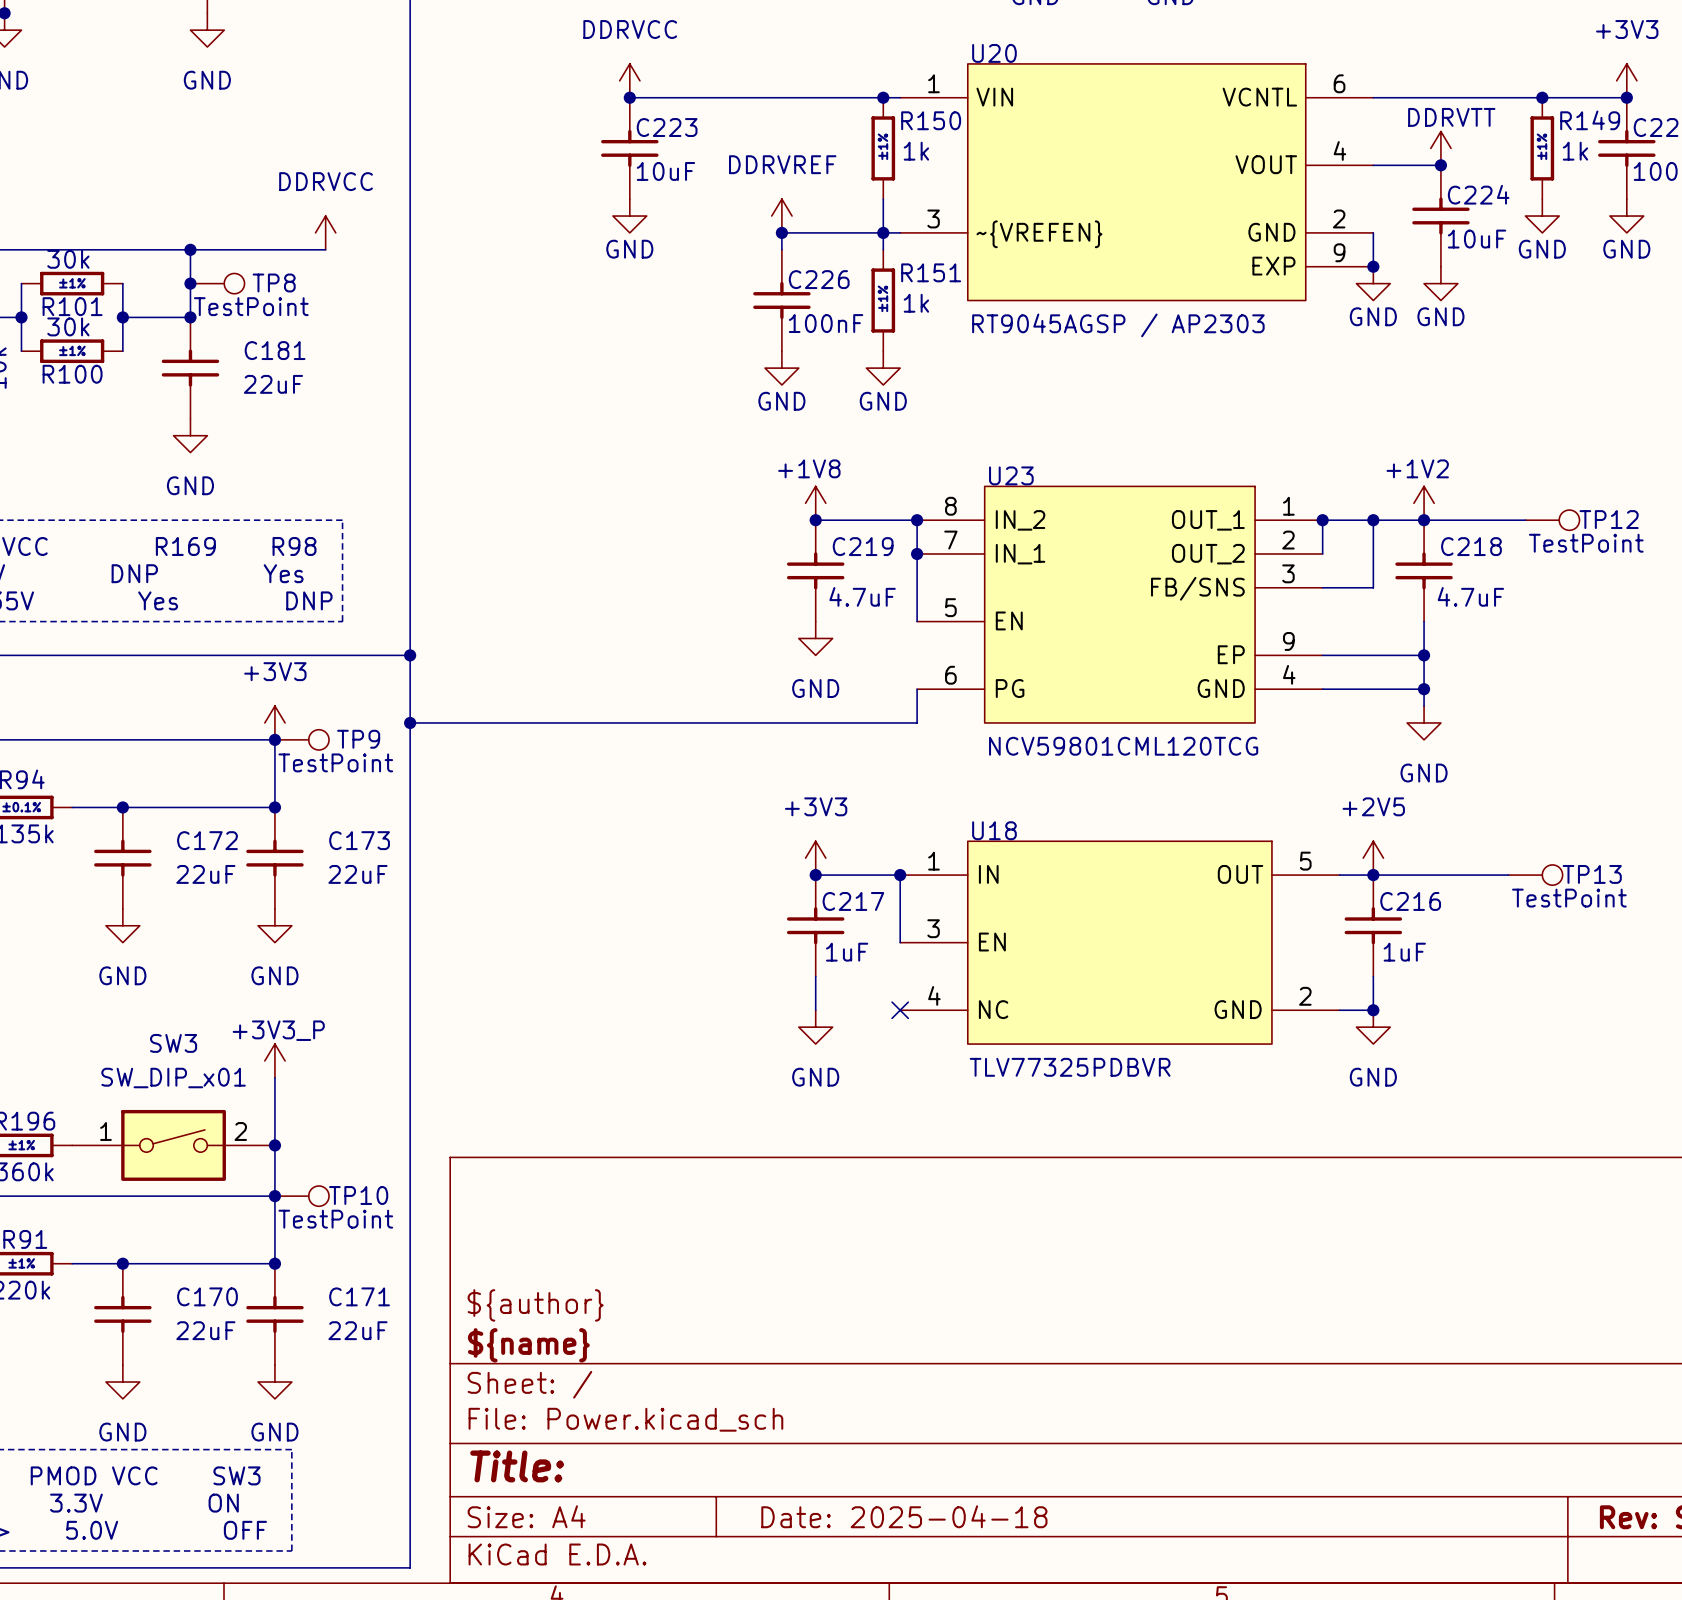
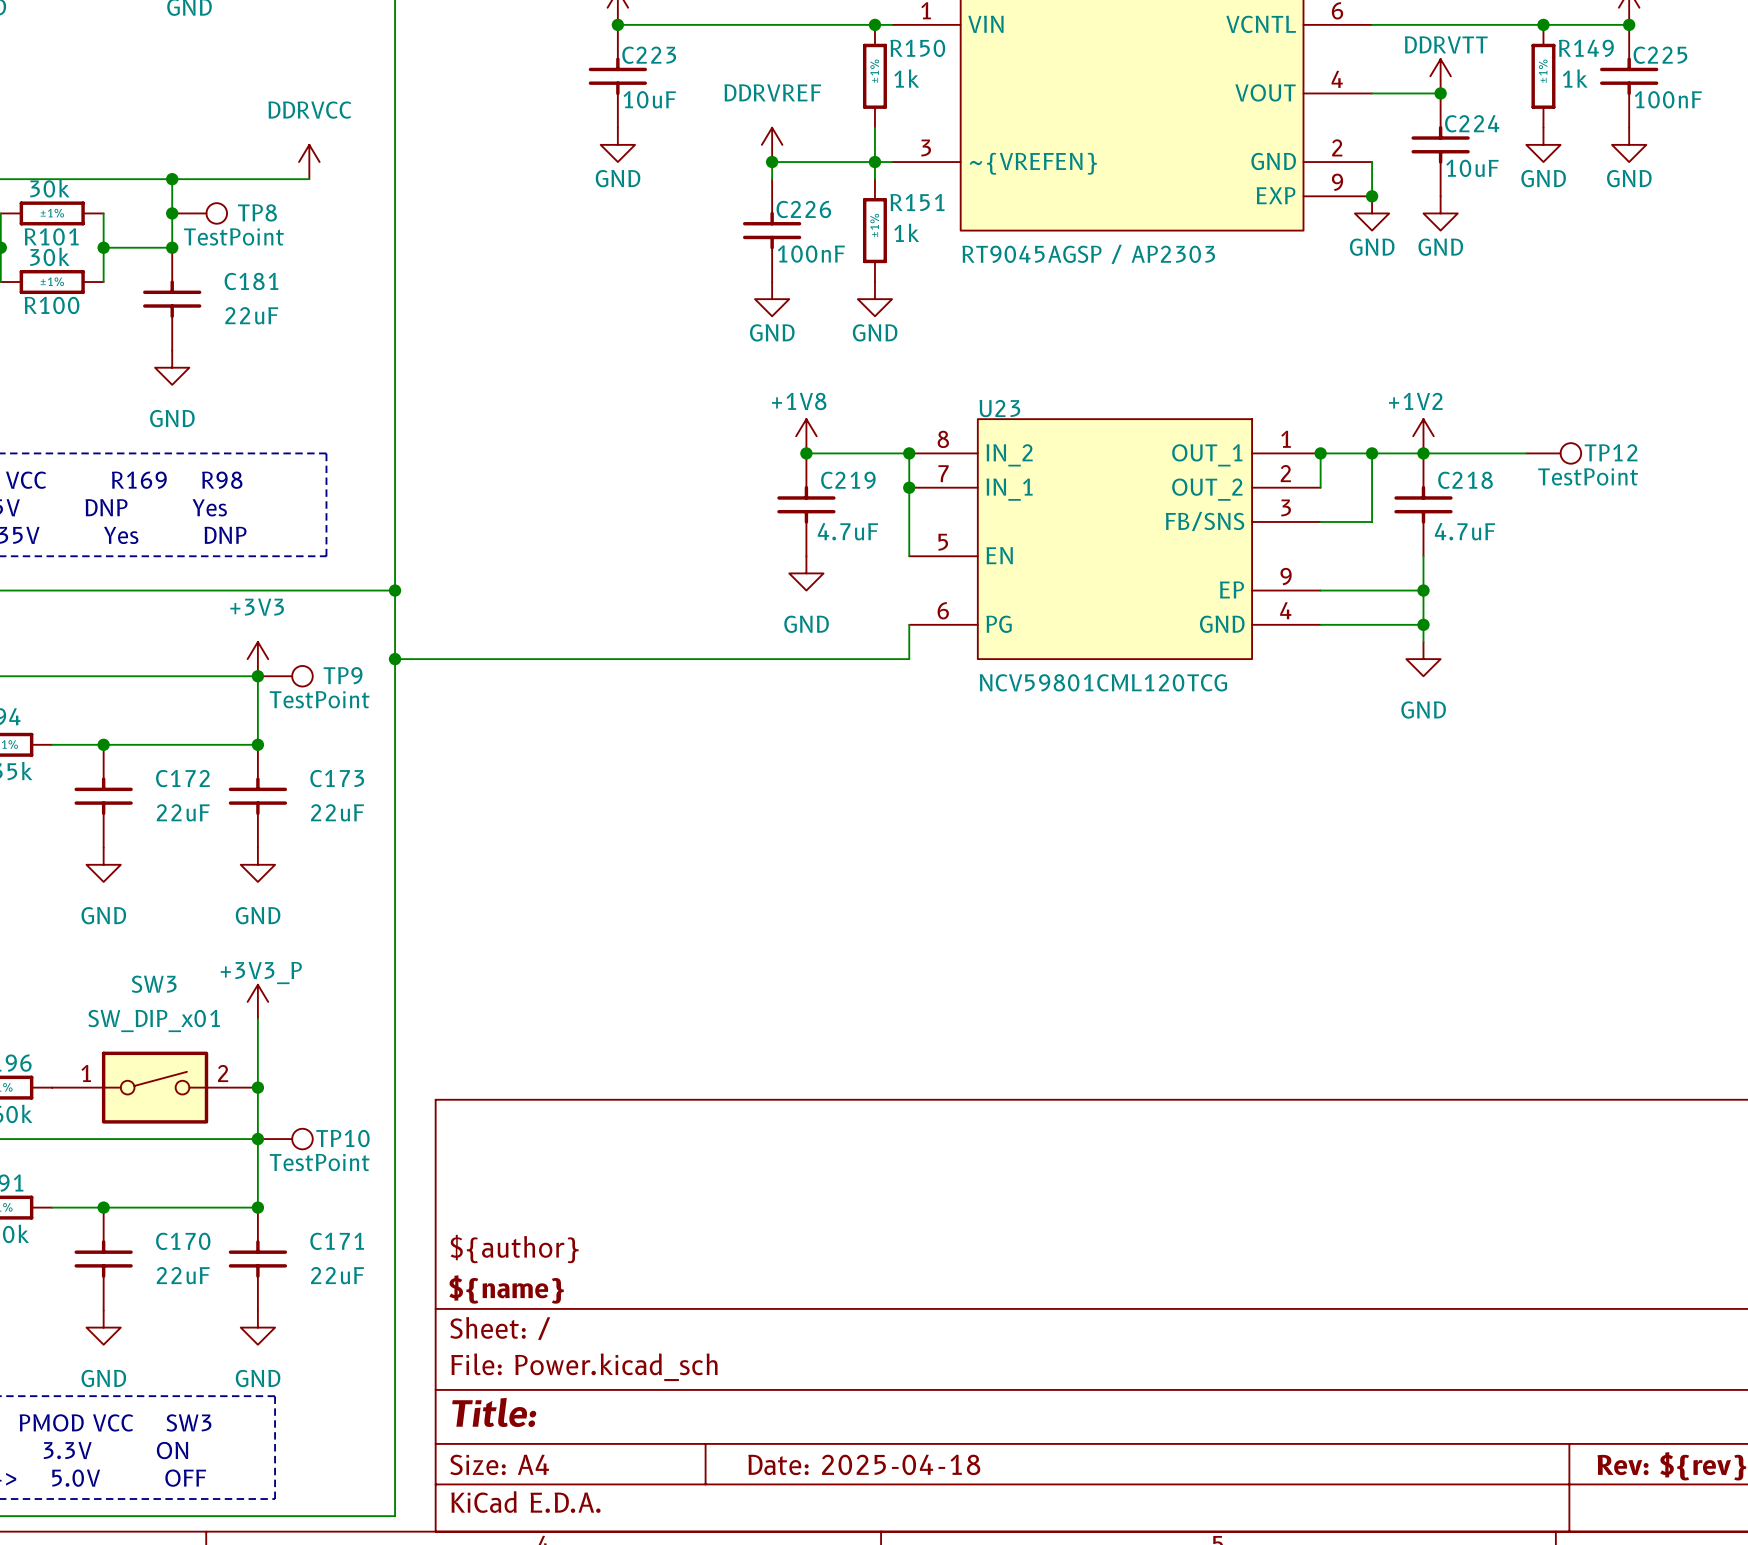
power symbol: +3V3 (815, 858) -> none
power symbol: +2V5 (1373, 858) -> none
wire: (815, 875) (900, 875) (900, 942) -> none
junction: (815, 875) -> none
junction: (900, 875) -> none
wire: (1339, 875) (1508, 875) -> none
junction: (1373, 875) -> none
TP13: TestPoint (1535, 875) -> none
C217: (815, 925) -> none
C216: (1373, 925) -> none
U18: TLV77325PDBVR (1119, 942) -> none
wire: (815, 976) (815, 1010) -> none
wire: (1373, 976) (1373, 1010) (1339, 1010) -> none
no-connect mark: (900, 1010) -> none
junction: (1373, 1010) -> none
power symbol: GND (815, 1027) -> none
power symbol: GND (1373, 1027) -> none

